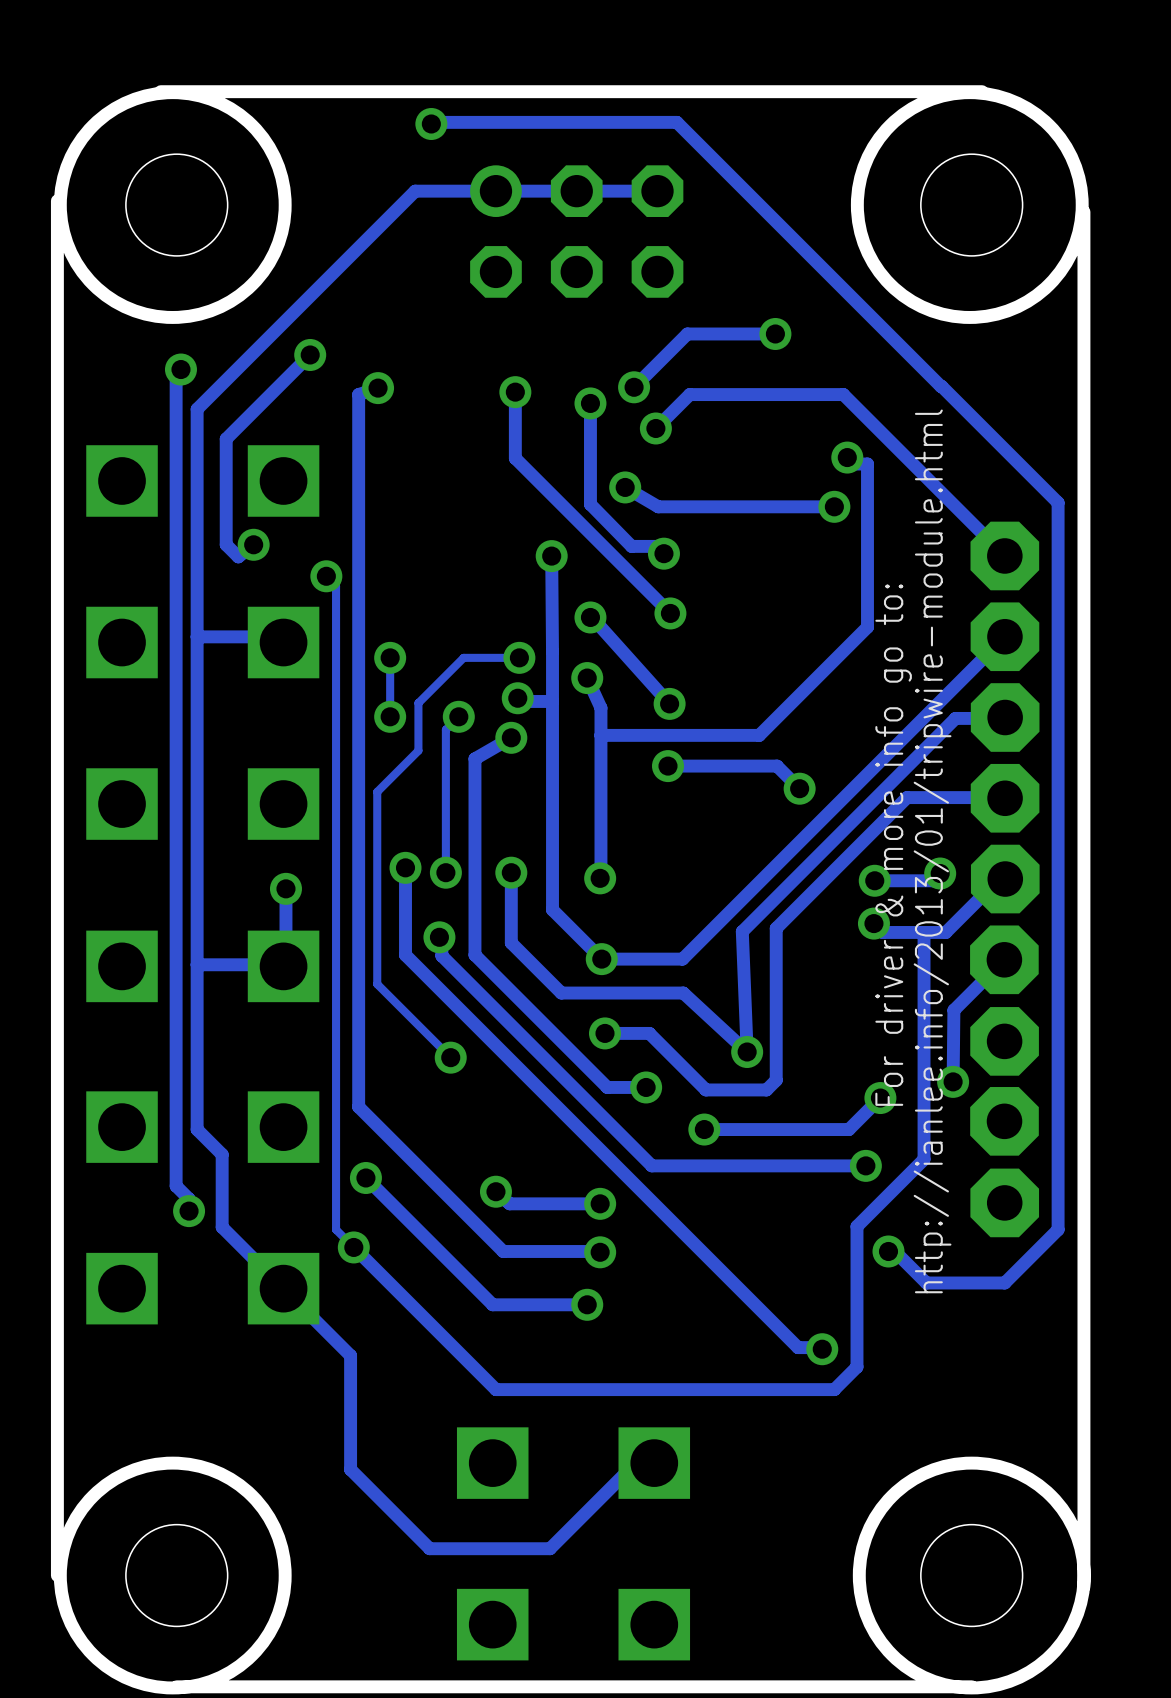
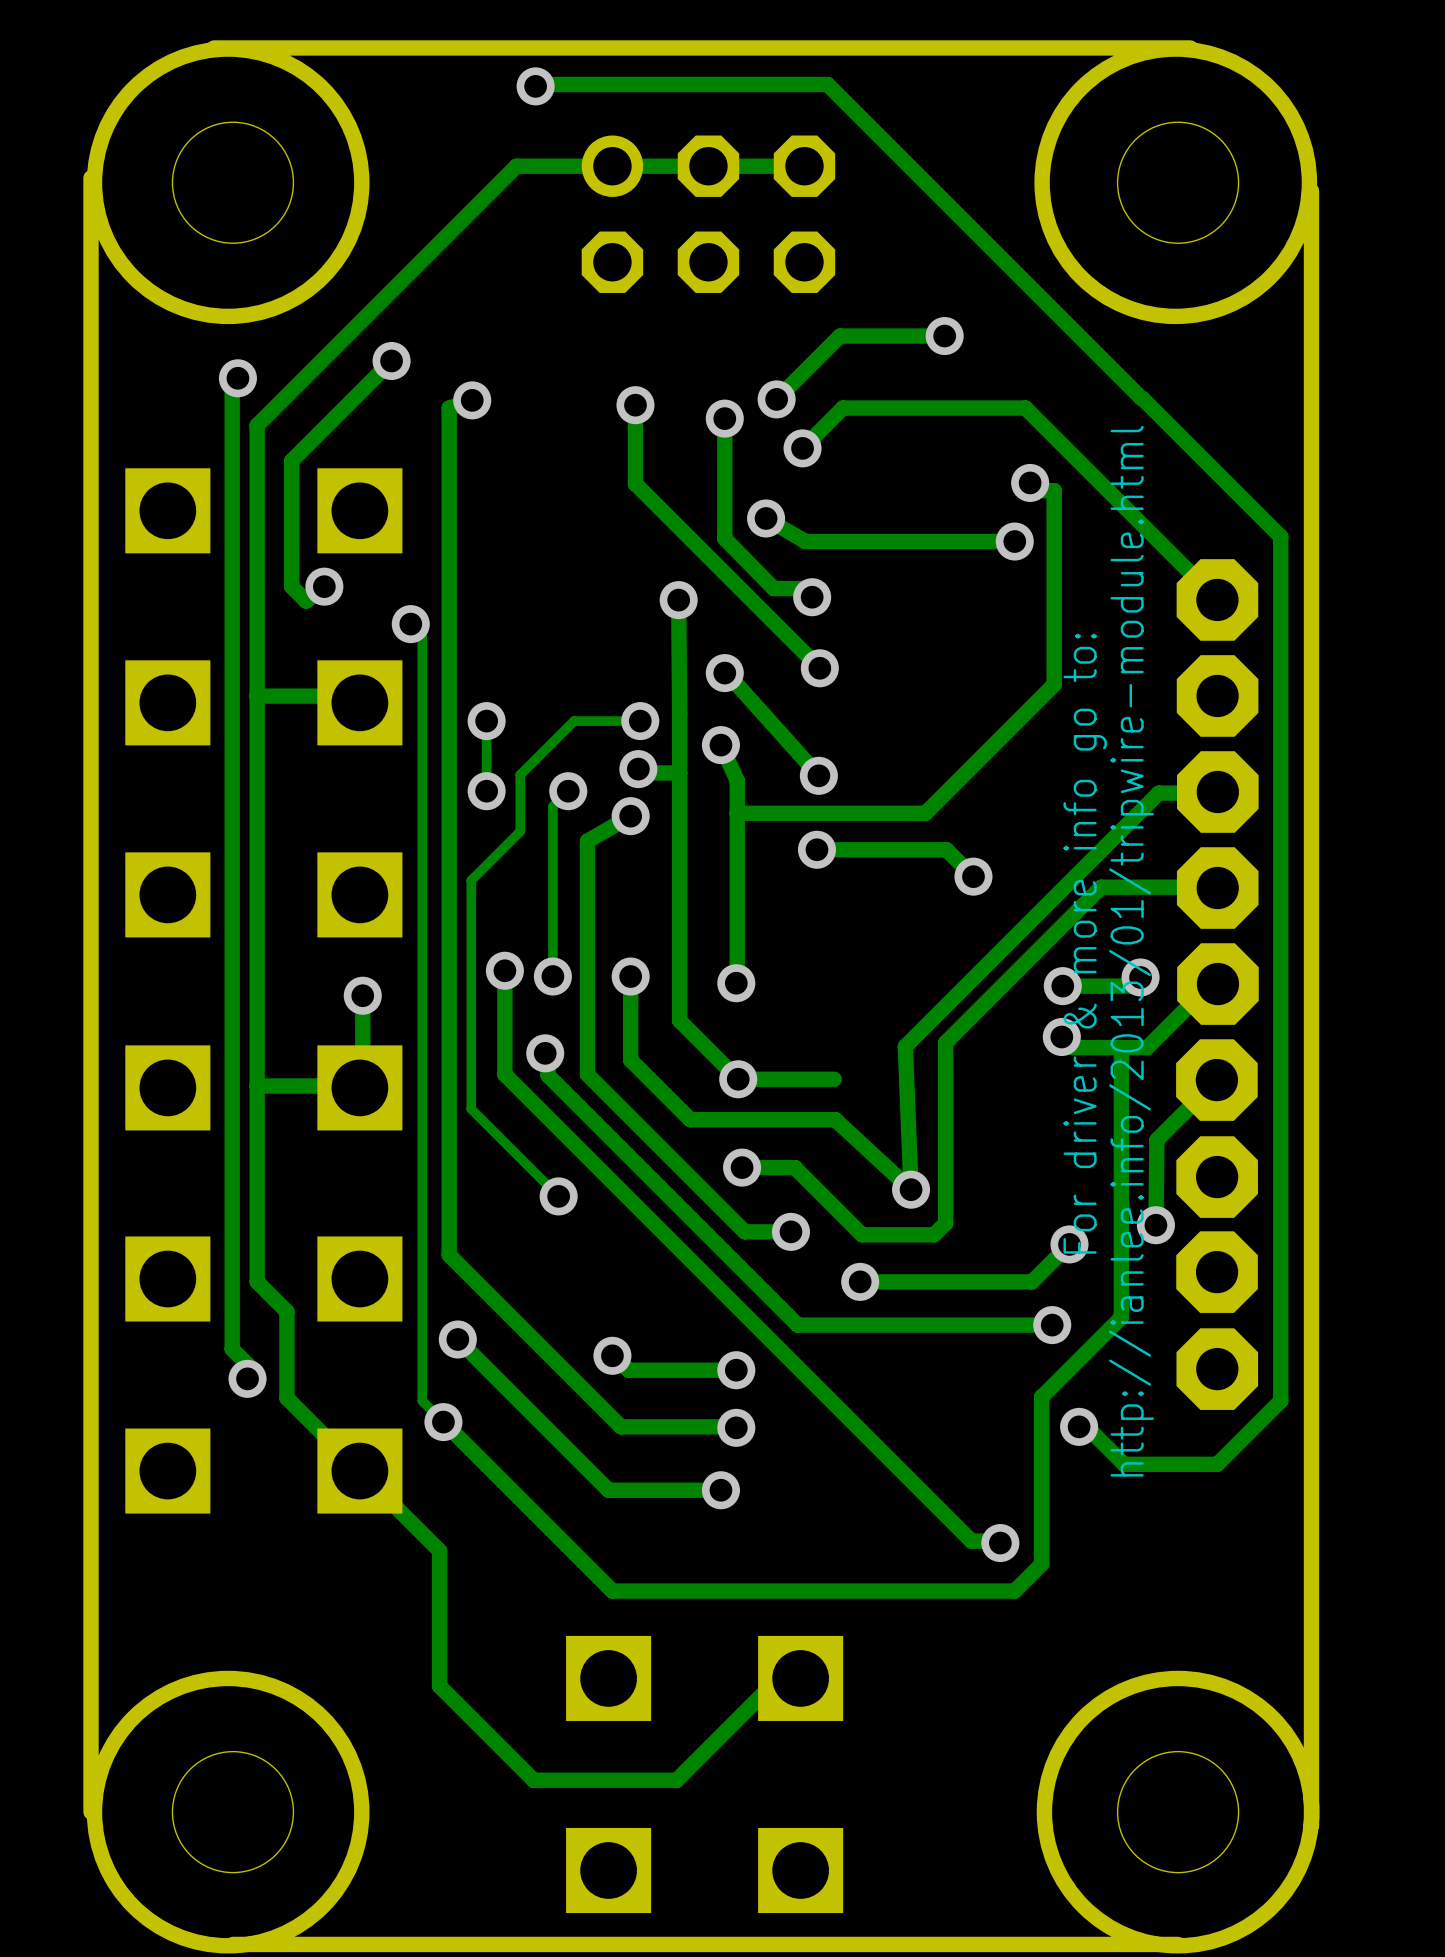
track: (1004, 636) (682, 959) -> none

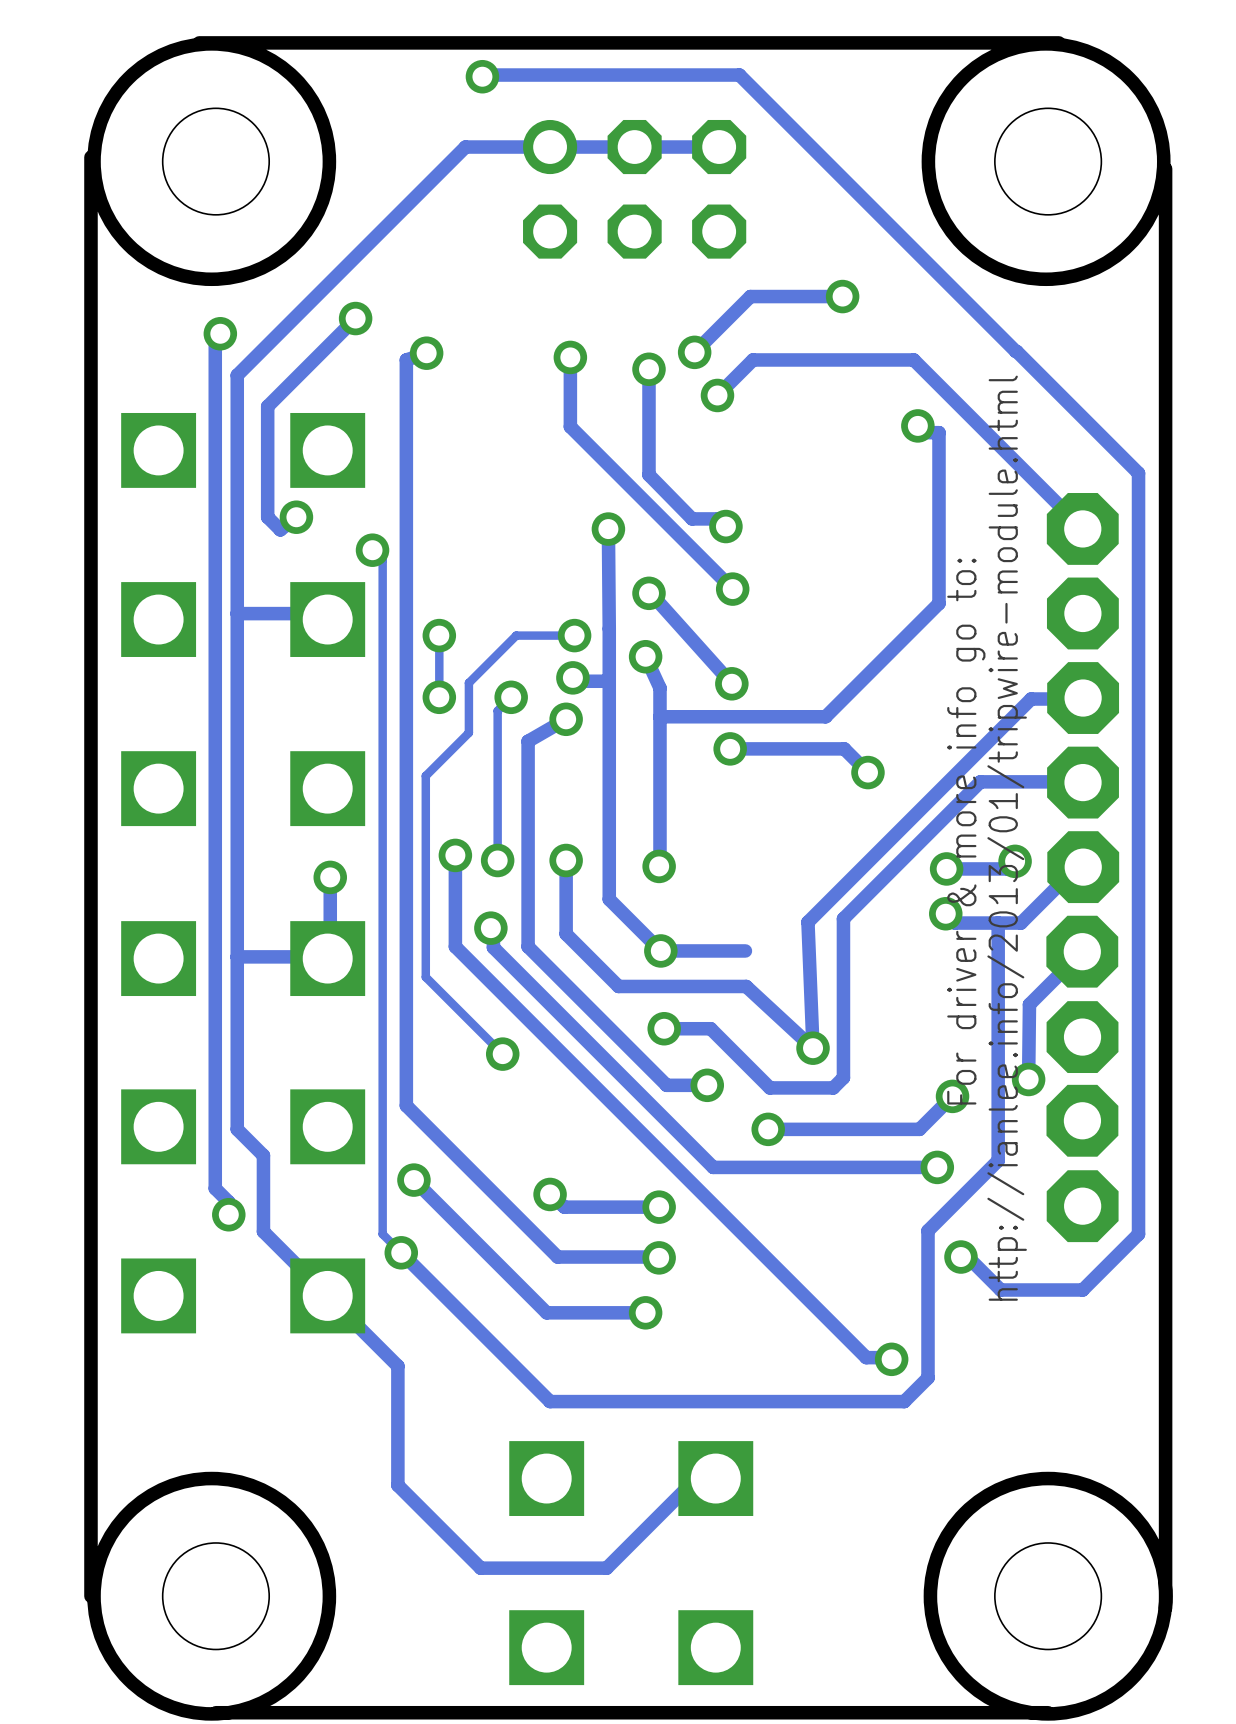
track: (766, 518) (805, 541) (1014, 541) -> none
via: (766, 518) -> none
via: (1014, 541) -> none

